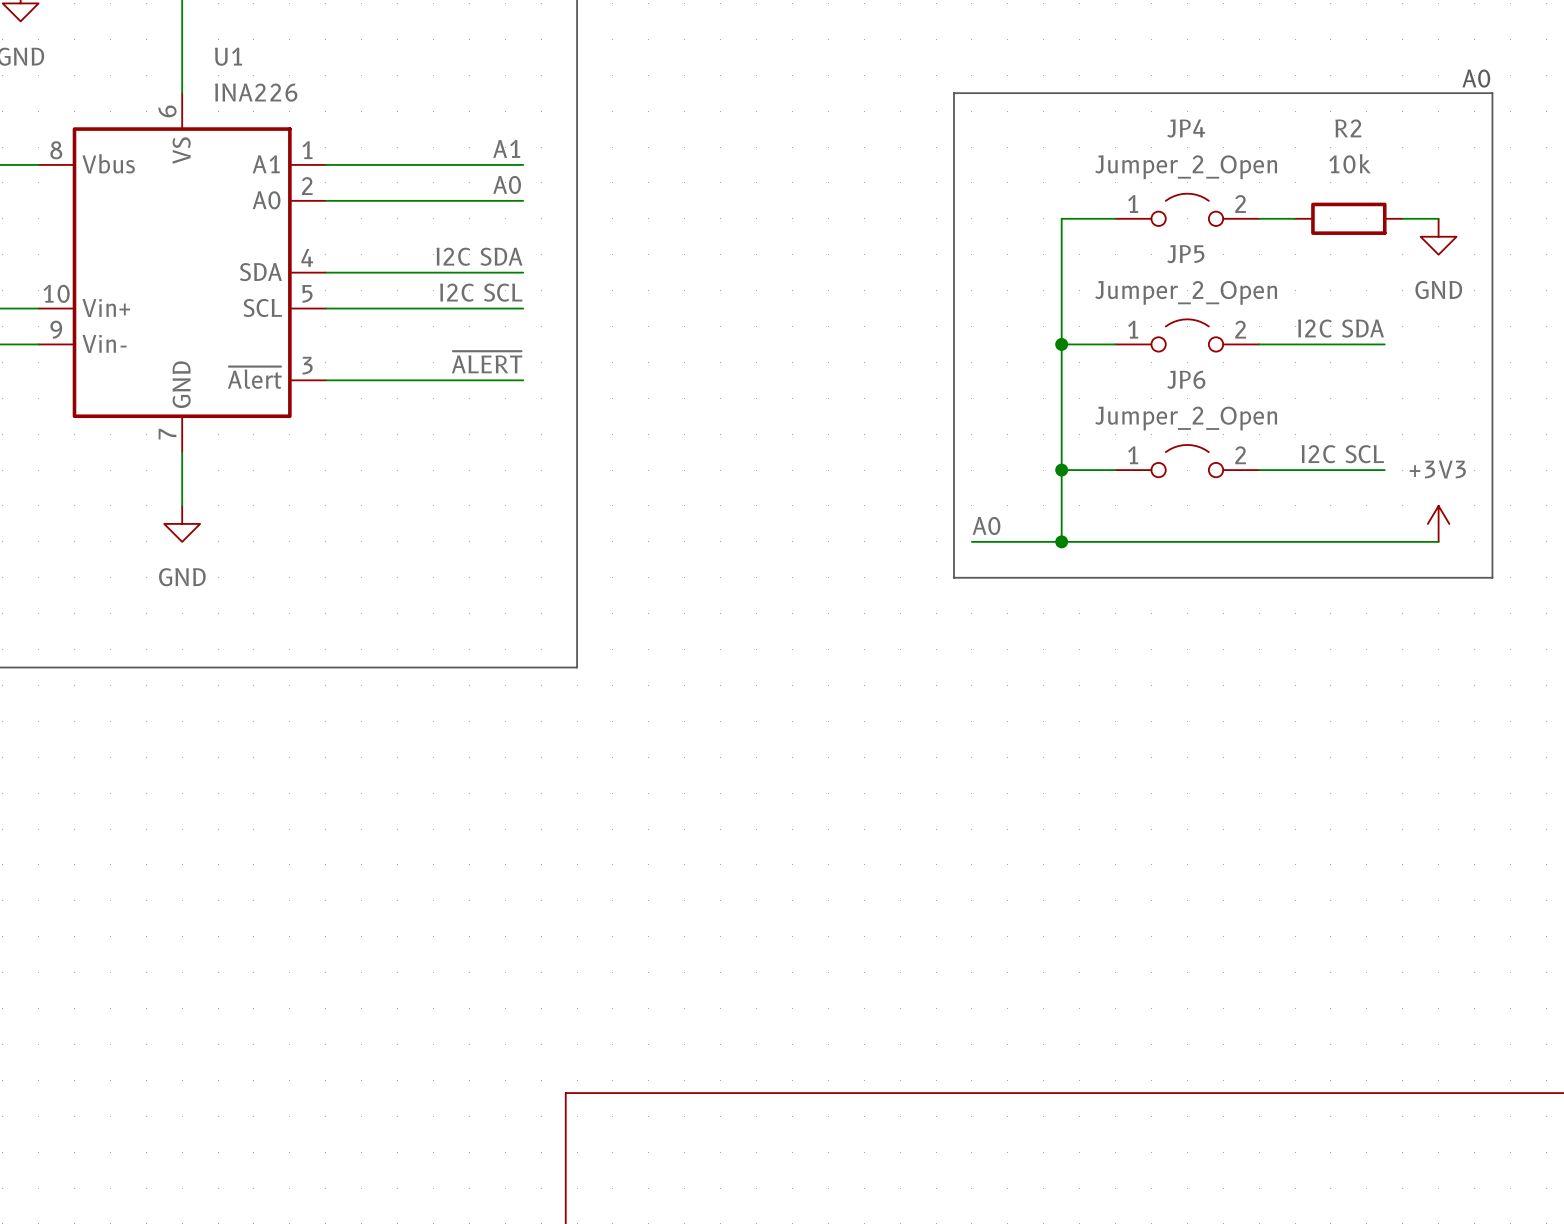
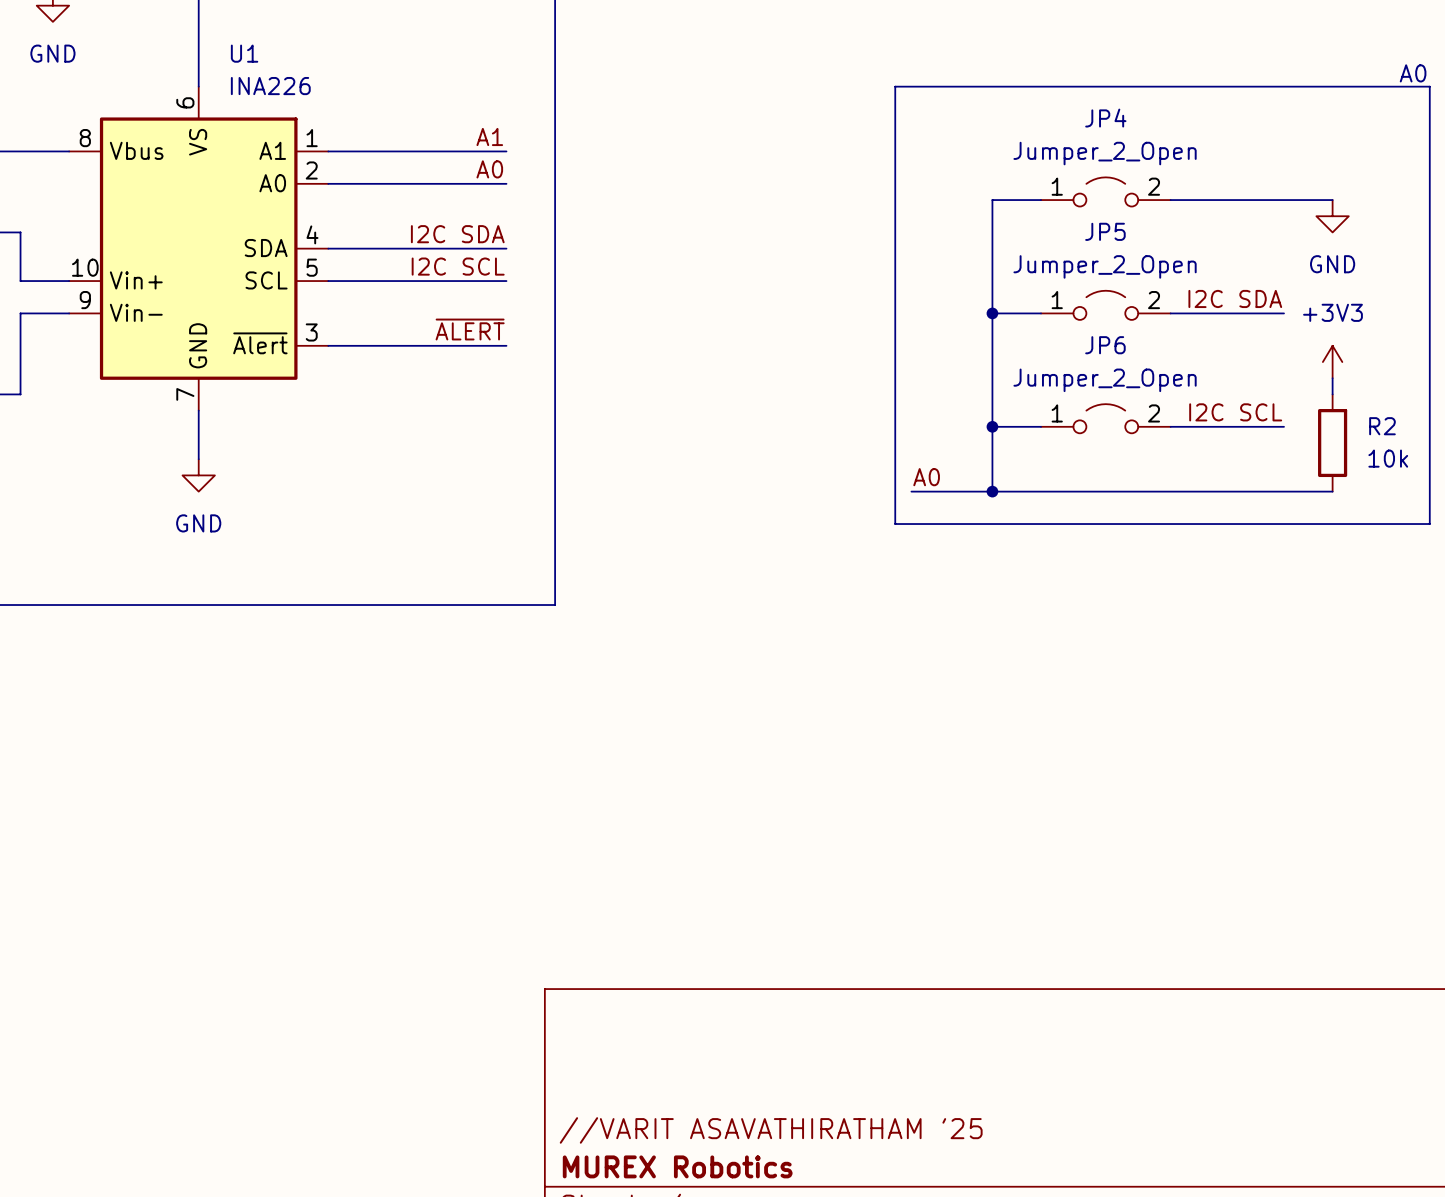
text position: A0 (1476, 78) -> A0 (1413, 73)
line: (1492, 93) (1492, 577) -> (1381, 86) (1429, 86) (1429, 524) (1381, 524)
R2 name position: R2 (1348, 128) -> R2 (1382, 426)
wire: none -> (1203, 200) (1300, 200)
R2 rotation: 0° (1348, 218) -> 90° clockwise (1332, 443)
R2 position: (1348, 218) -> (1332, 443)
wire: none -> (1332, 378) (1332, 394)
power symbol position: +3V3 (1438, 523) -> +3V3 (1332, 362)

